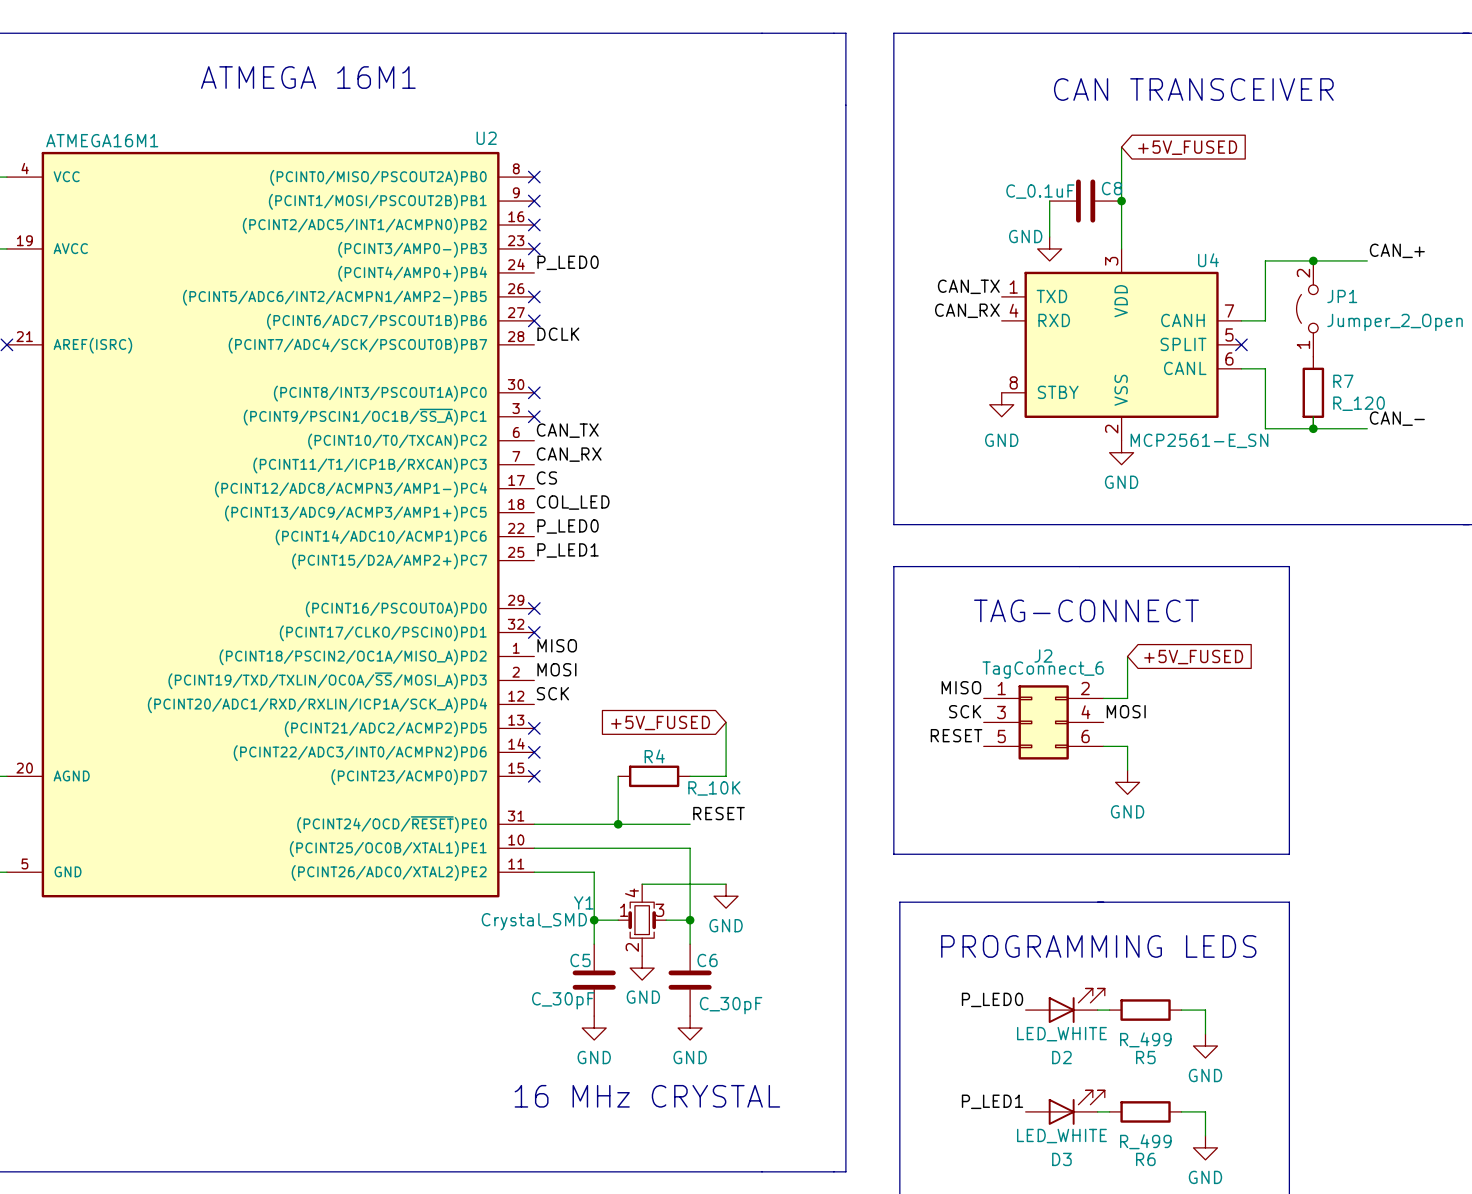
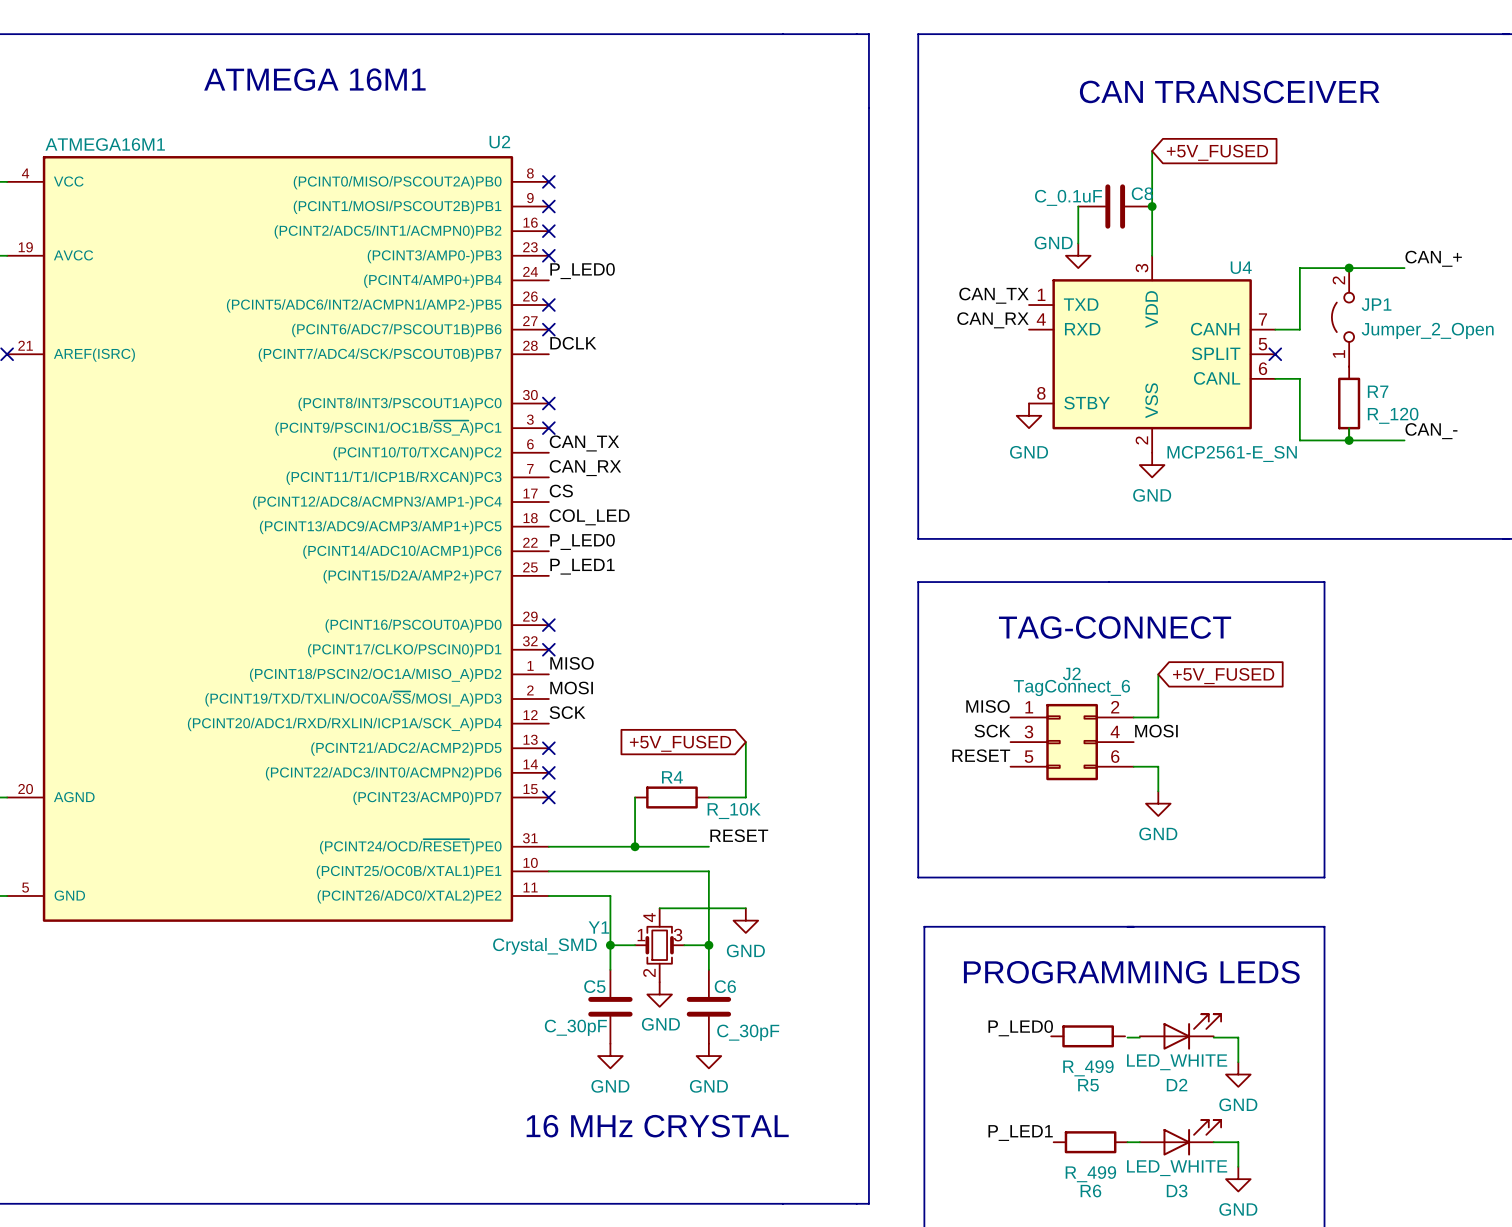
D2 position: (1065, 1005) -> (1180, 1031)
R5 position: (1145, 1010) -> (1088, 1036)
D3 position: (1065, 1107) -> (1180, 1137)
R6 position: (1145, 1111) -> (1090, 1142)

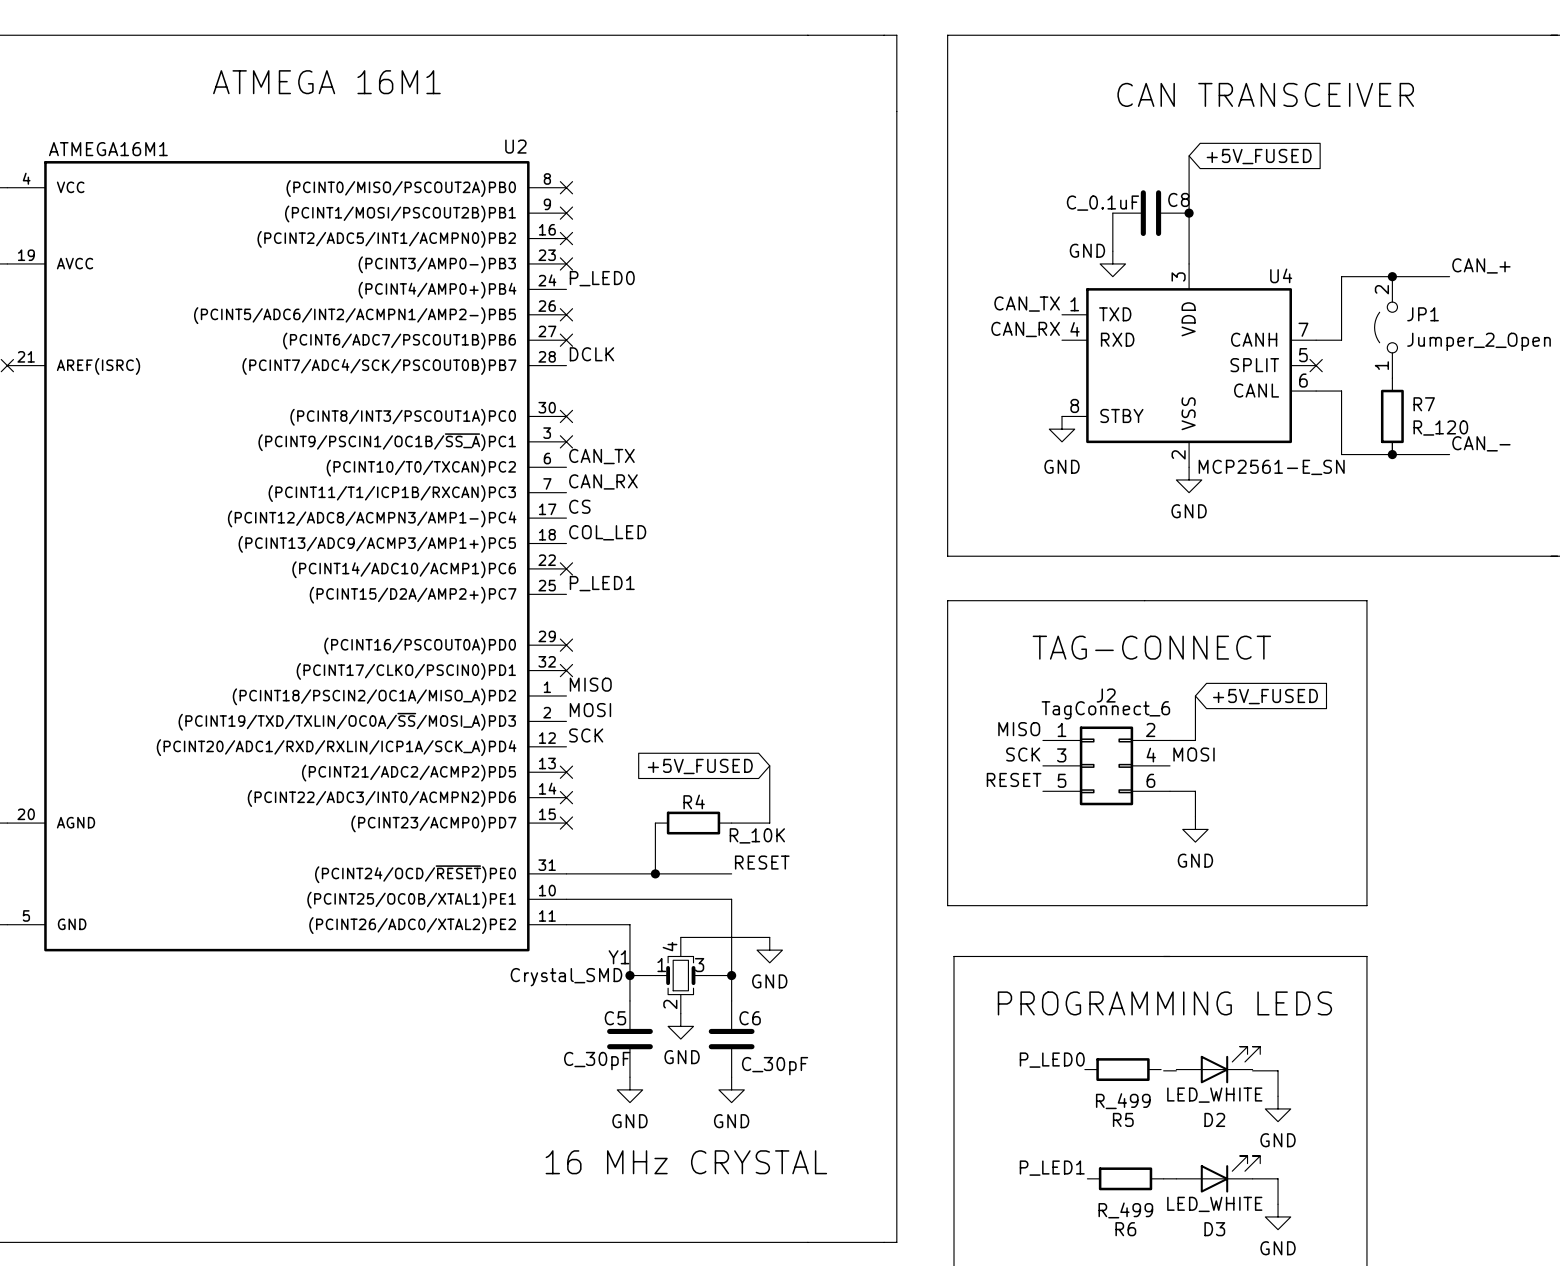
label: P_LED0 (582, 541) -> none
no-connect mark: none -> (566, 568)

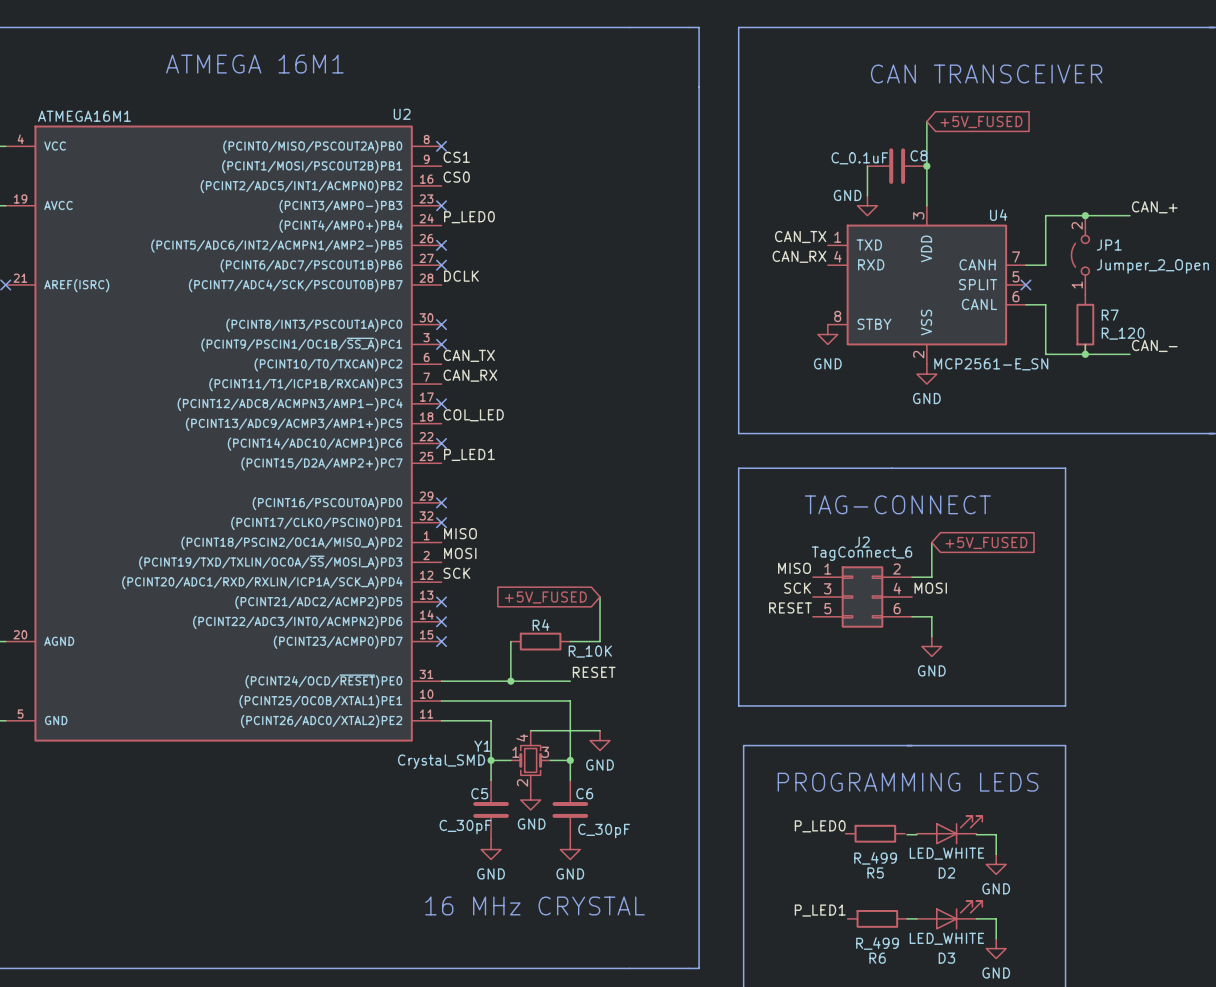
label: none -> CS1 (456, 157)
no-connect mark: (566, 213) -> none
label: none -> CS0 (456, 177)
no-connect mark: (566, 238) -> none
label: CS (579, 506) -> none
no-connect mark: none -> (441, 403)

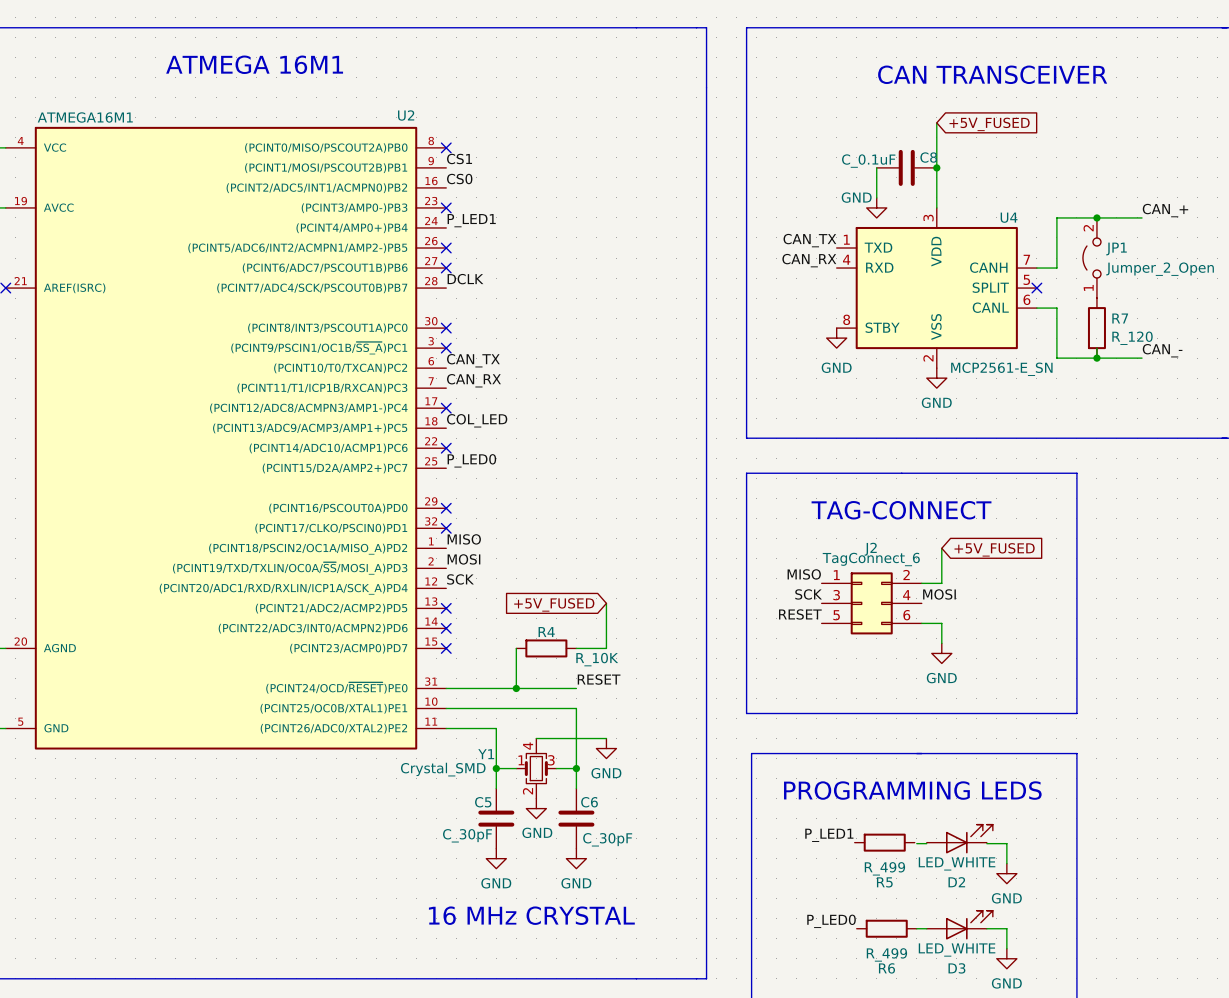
label: P_LED0 (469, 217) -> P_LED1 (471, 220)
label: P_LED1 (469, 454) -> P_LED0 (471, 460)
label: P_LED0 (820, 826) -> P_LED1 (829, 835)
label: P_LED1 (820, 910) -> P_LED0 (831, 921)

